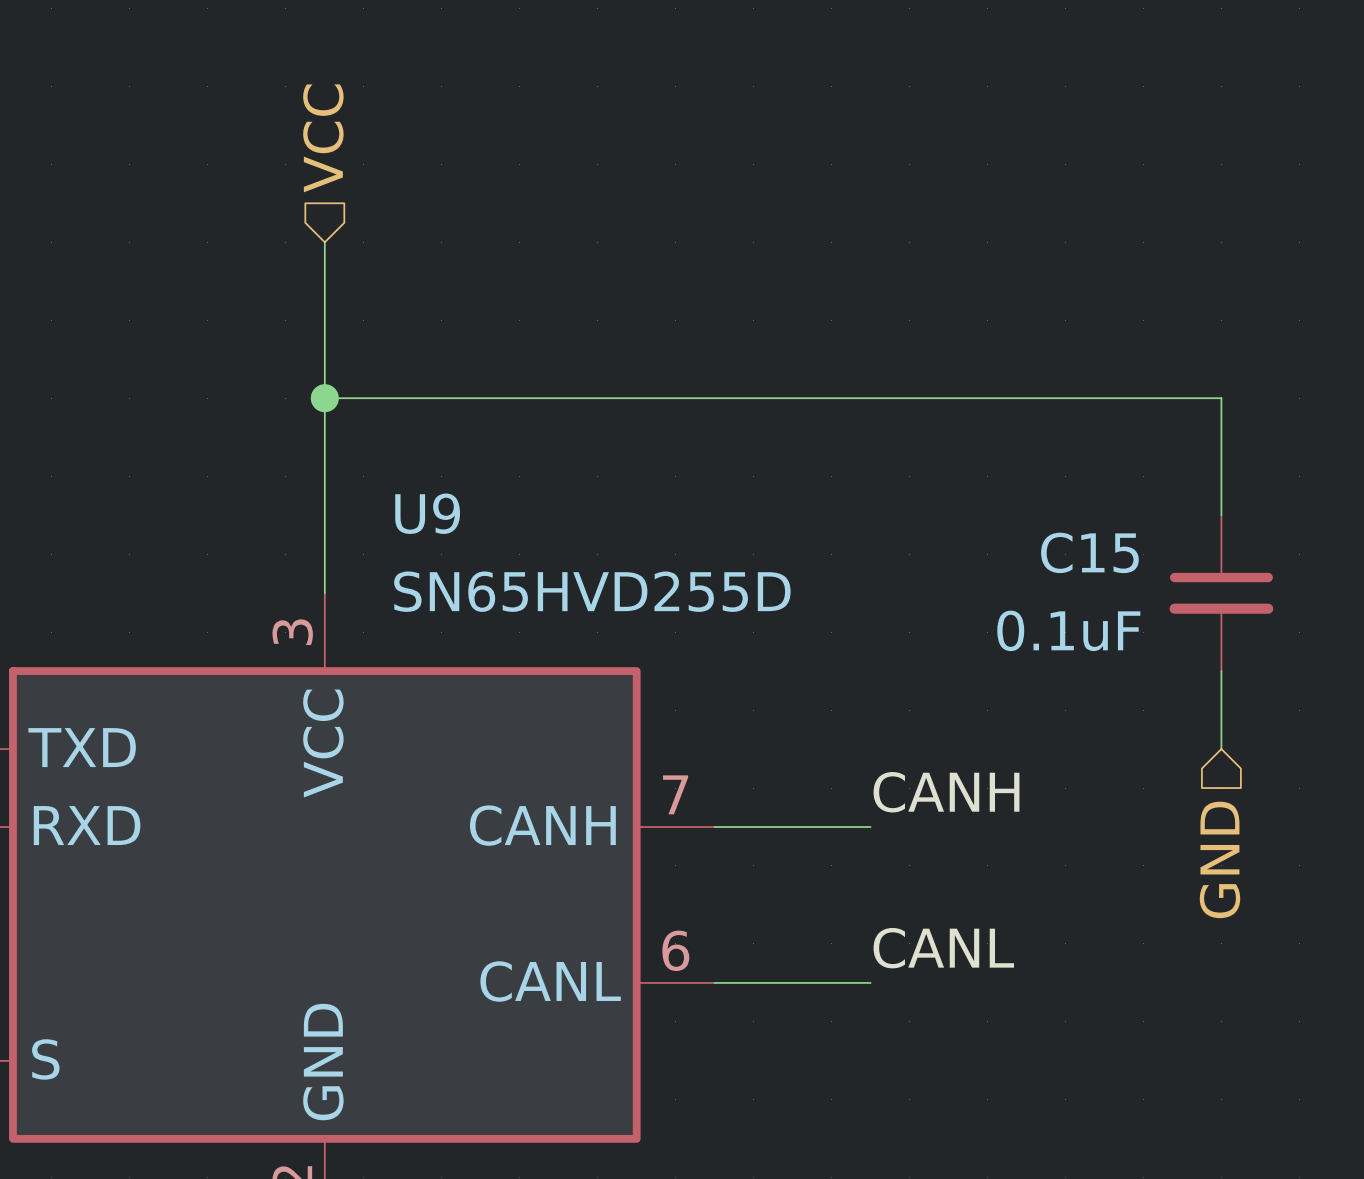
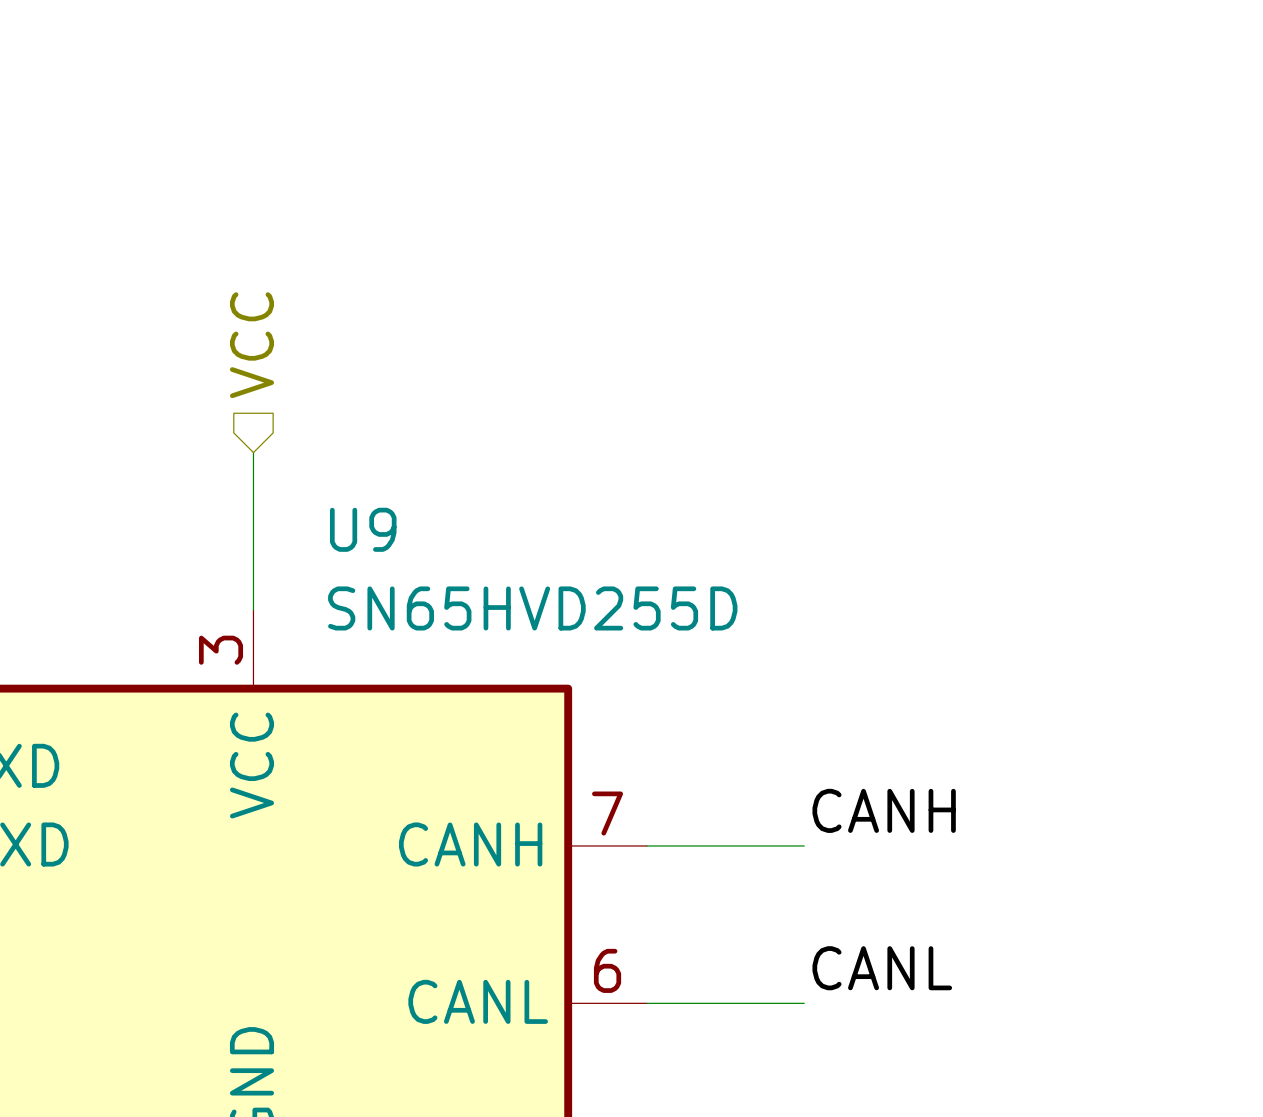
hierarchical label position: VCC (323, 138) -> VCC (251, 345)
wire: (324, 242) (324, 437) -> none
wire: (324, 398) (1221, 398) (1221, 515) -> none
junction: (324, 398) -> none
C15: 0.1uF (1221, 593) -> none
wire: (1221, 671) (1221, 749) -> none
hierarchical label: GND (1219, 859) -> none

